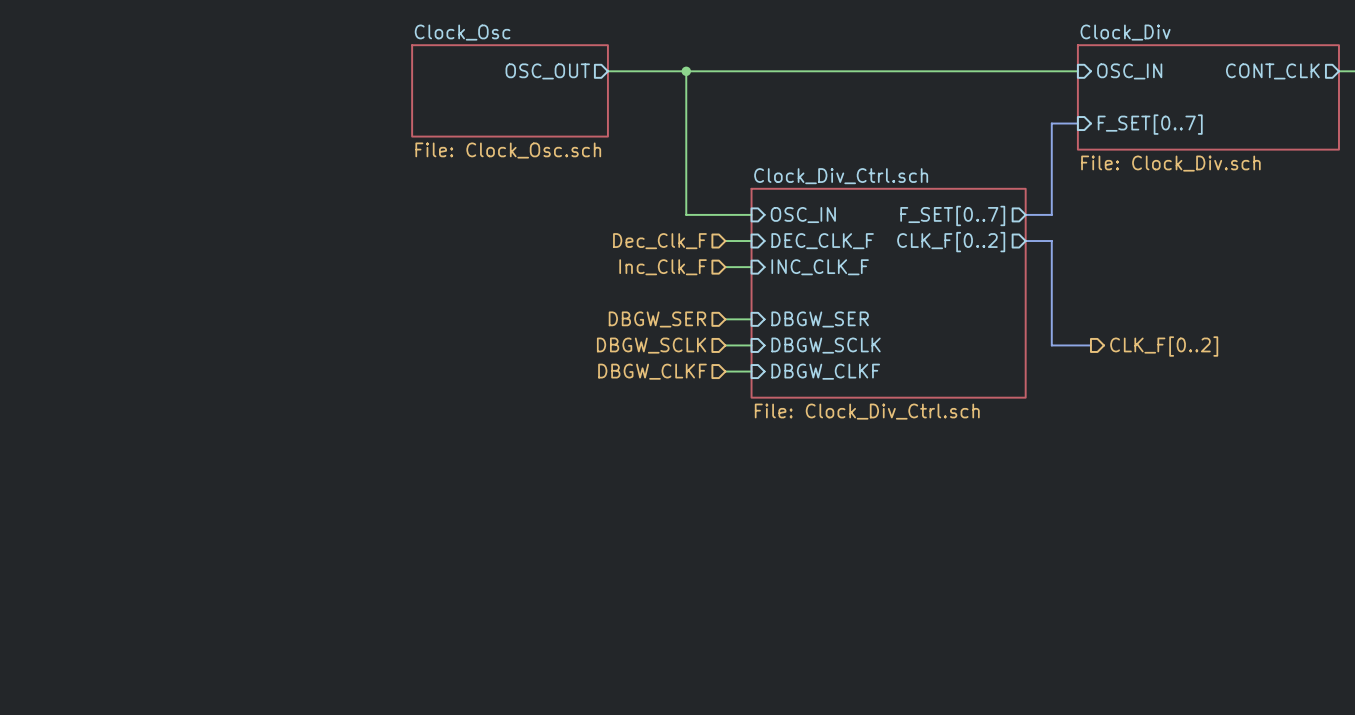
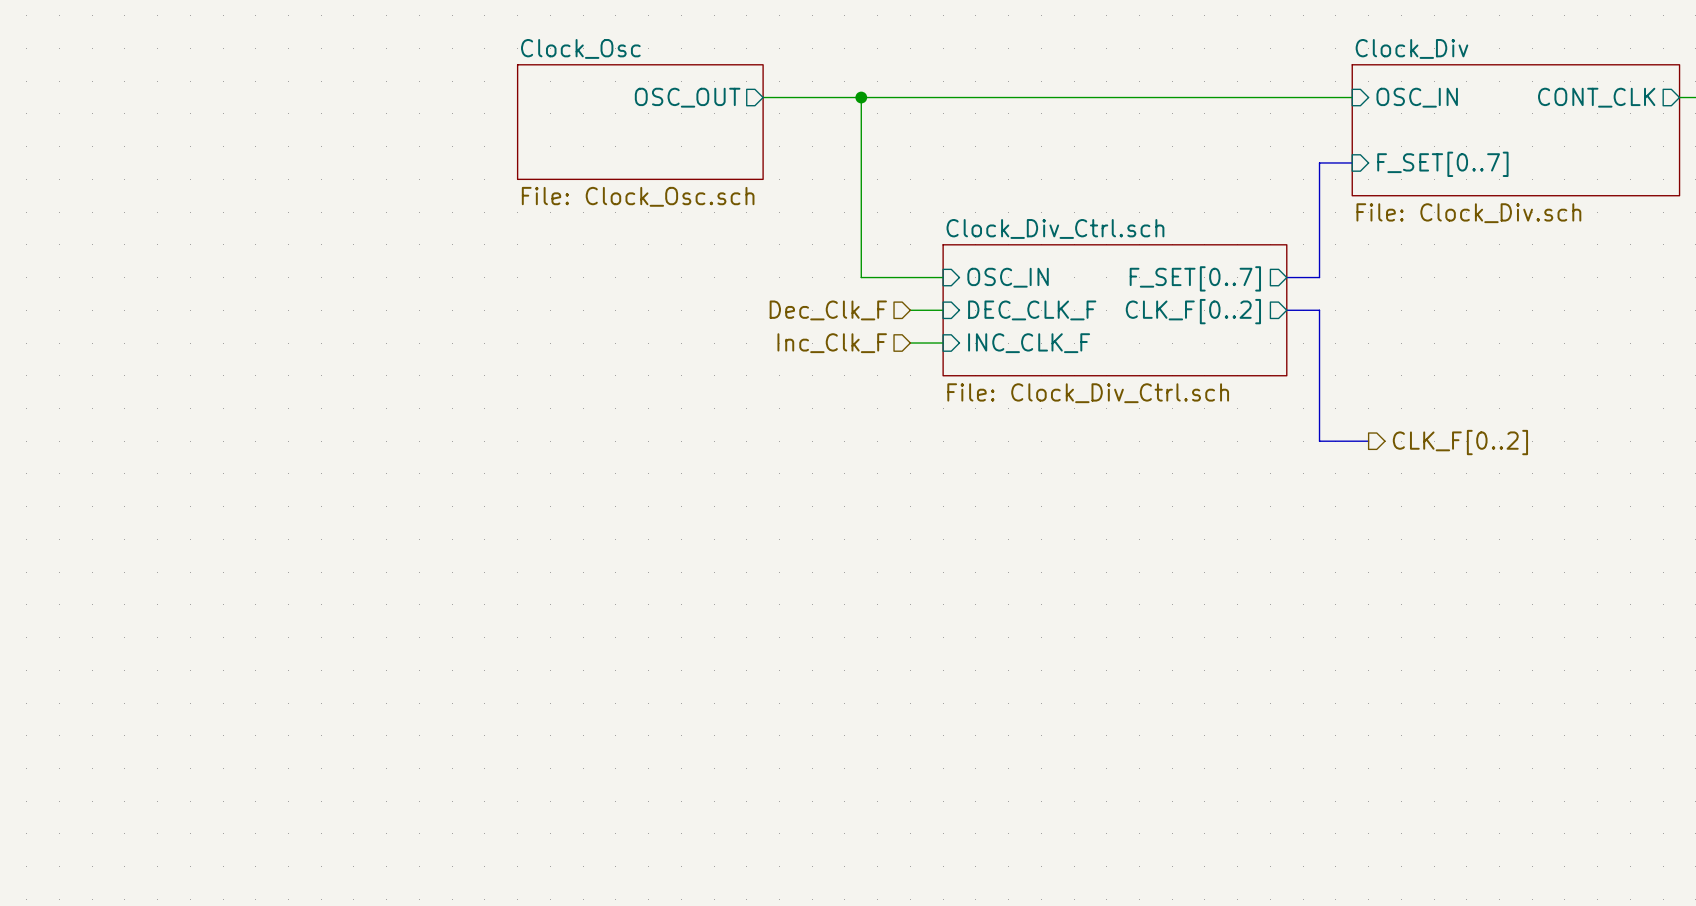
sheet Clock_Div_Ctrl.sch: none -> File: Clock_Div_Ctrl.sch (1114, 310)
sheet Clock_Div_Ctrl.sch: File: Clock_Div_Ctrl.sch (888, 293) -> none
hierarchical label: DBGW_SER (657, 319) -> none
wire: (725, 319) (751, 319) -> none
sheet pin: DBGW_SER (820, 319) -> none
hierarchical label: DBGW_SCLK (651, 345) -> none
wire: (725, 345) (751, 345) -> none
sheet pin: DBGW_SCLK (826, 345) -> none
hierarchical label: DBGW_CLKF (652, 371) -> none
wire: (725, 371) (751, 371) -> none
sheet pin: DBGW_CLKF (825, 371) -> none

